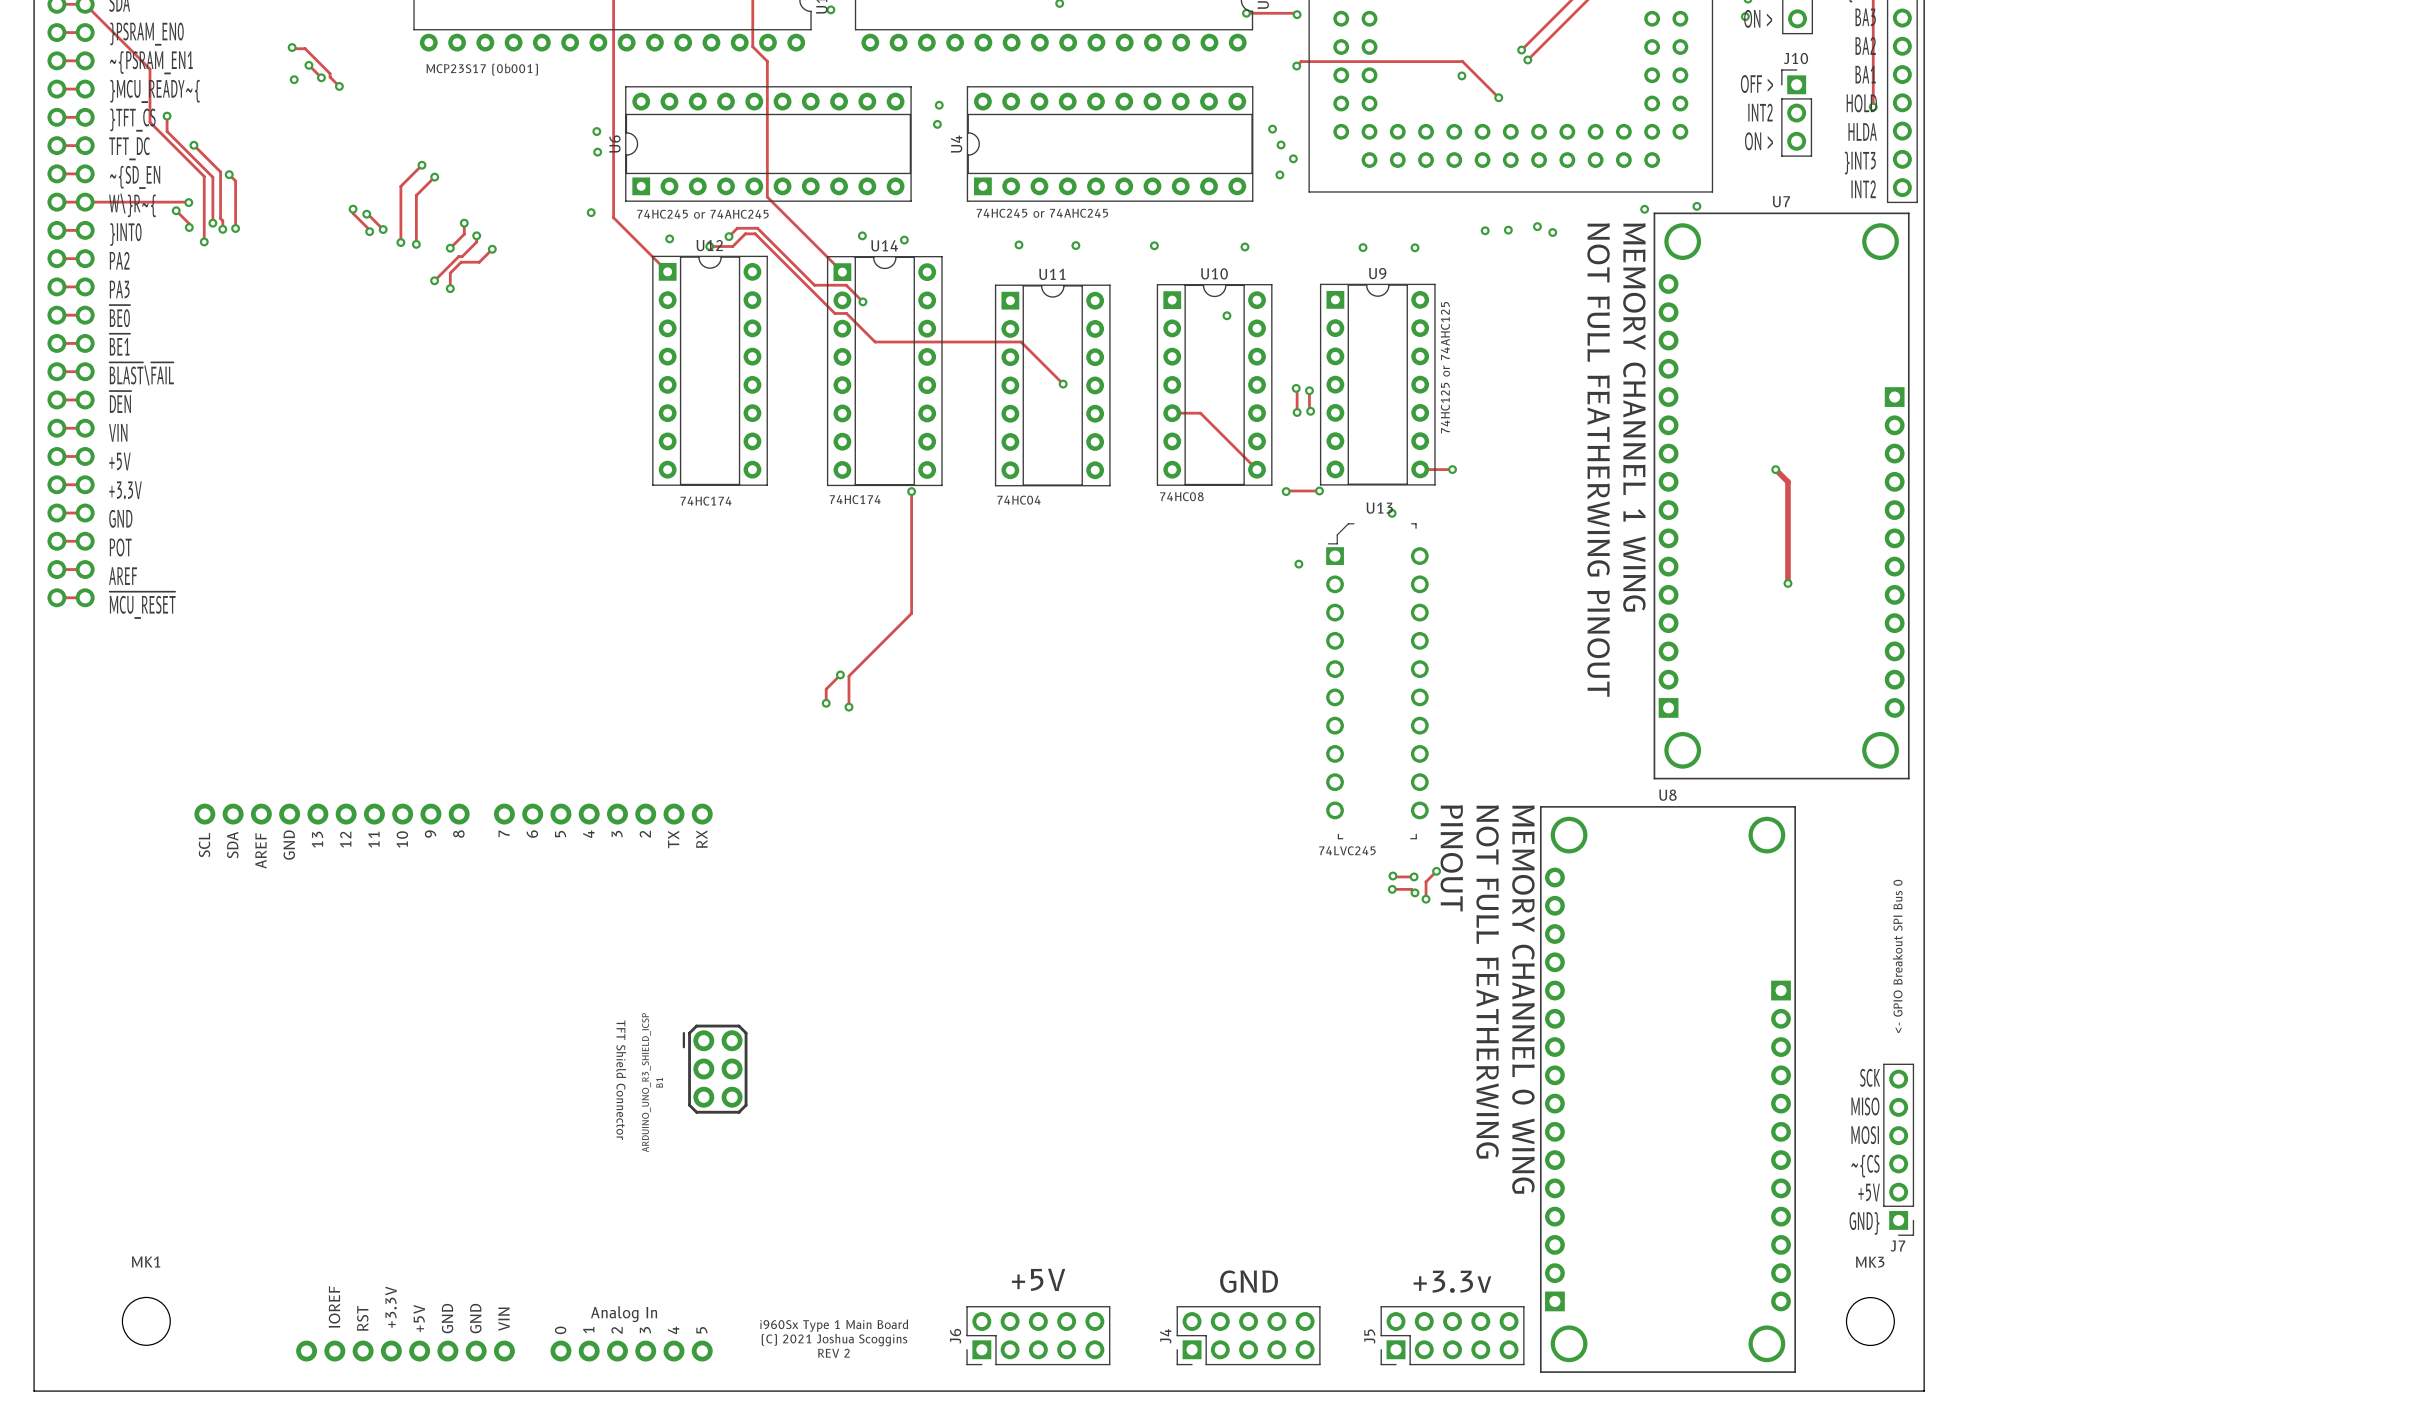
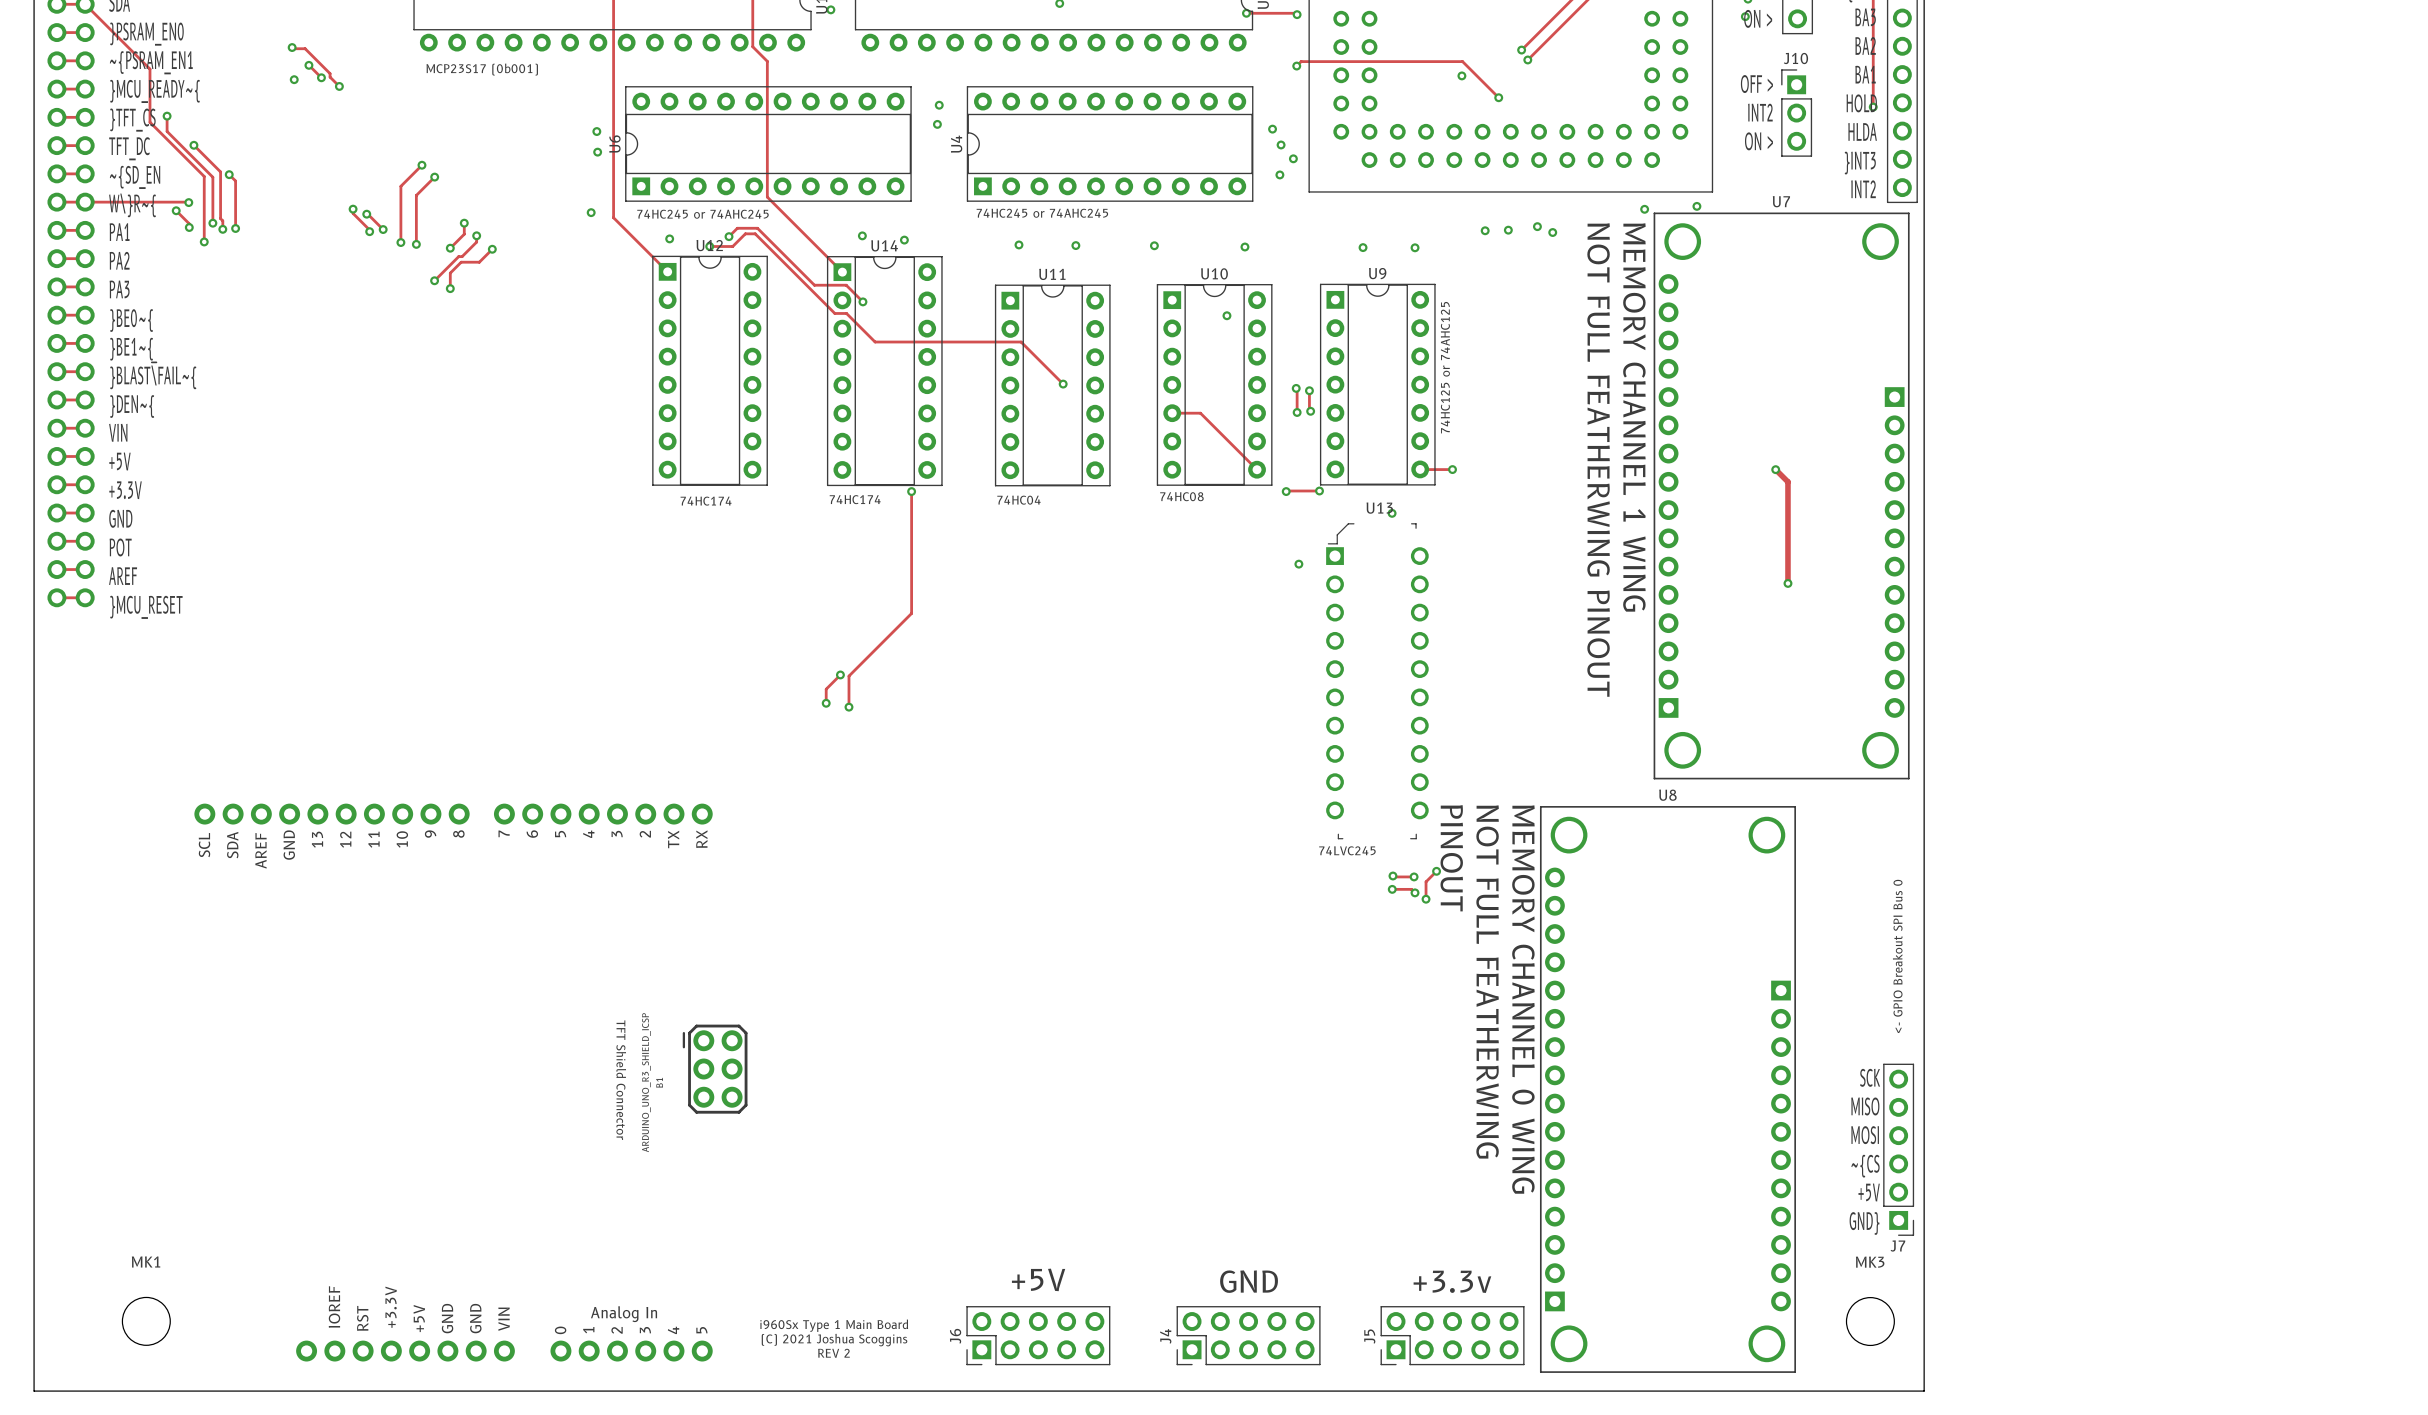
text: }INT0 (125, 234) -> PA1 (119, 232)
text: ~{BE0} (119, 316) -> }BE0~{ (131, 320)
text: ~{BE1} (119, 344) -> }BE1~{ (131, 349)
text: ~{BLAST}\~{FAIL} (141, 373) -> }BLAST~{\}FAIL~{ (153, 375)
text: ~{DEN} (120, 402) -> }DEN~{ (132, 406)
text: ~{MCU_RESET} (142, 605) -> }MCU_RESET (146, 607)

